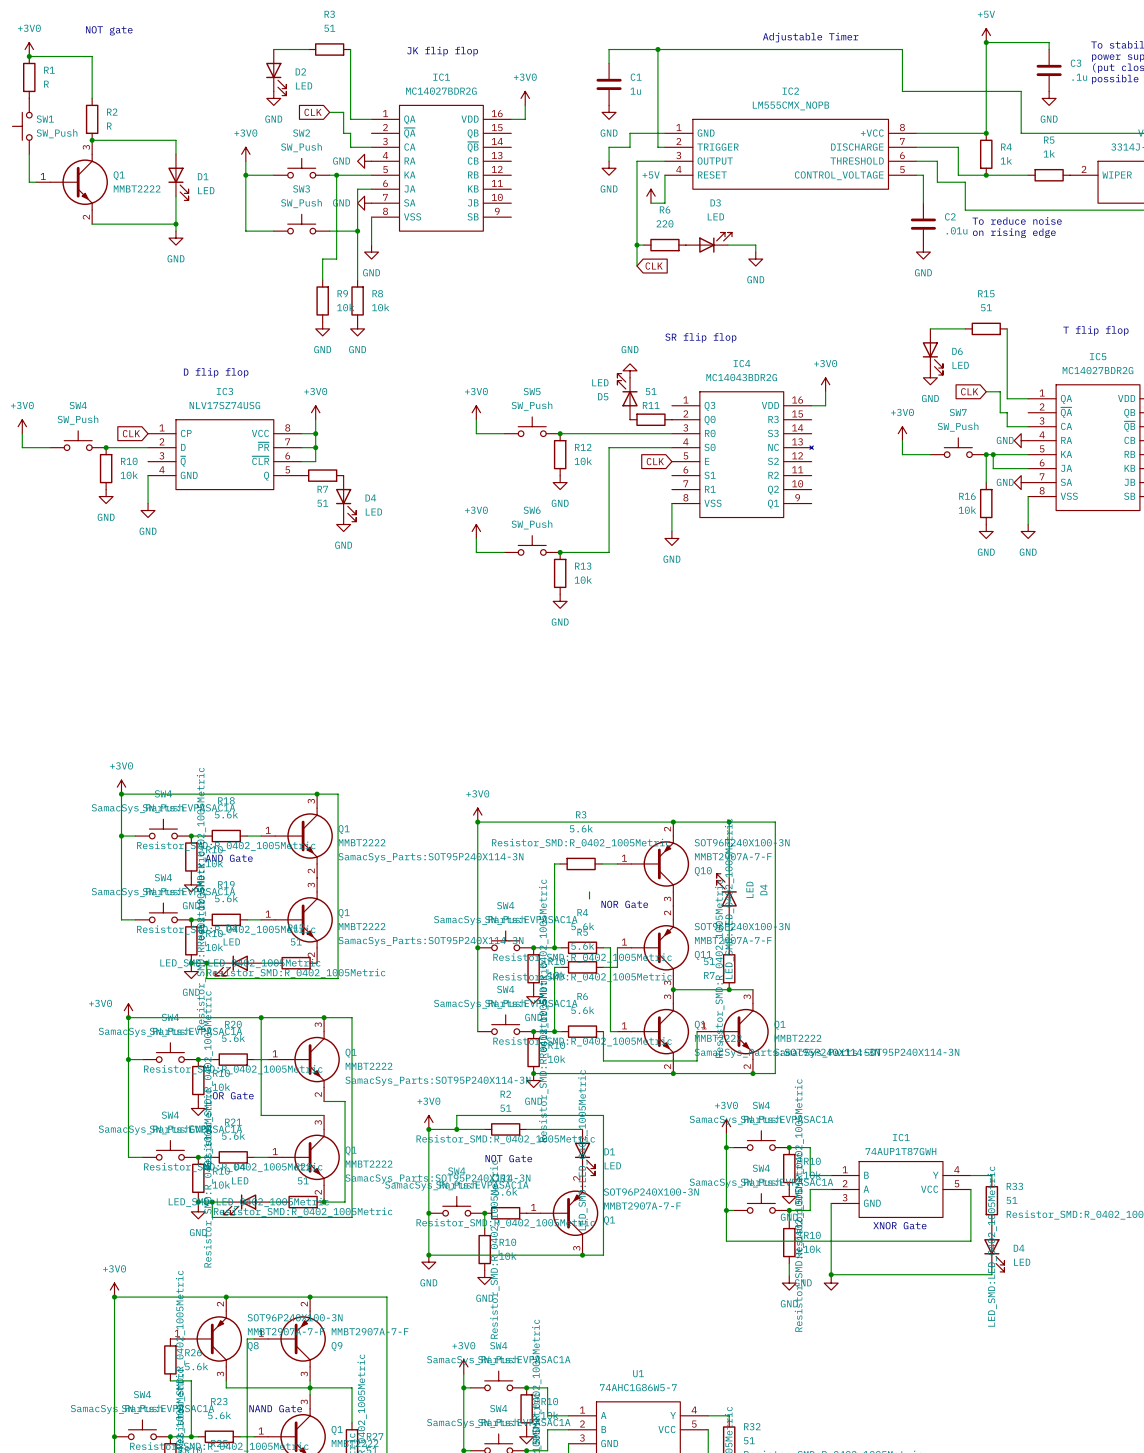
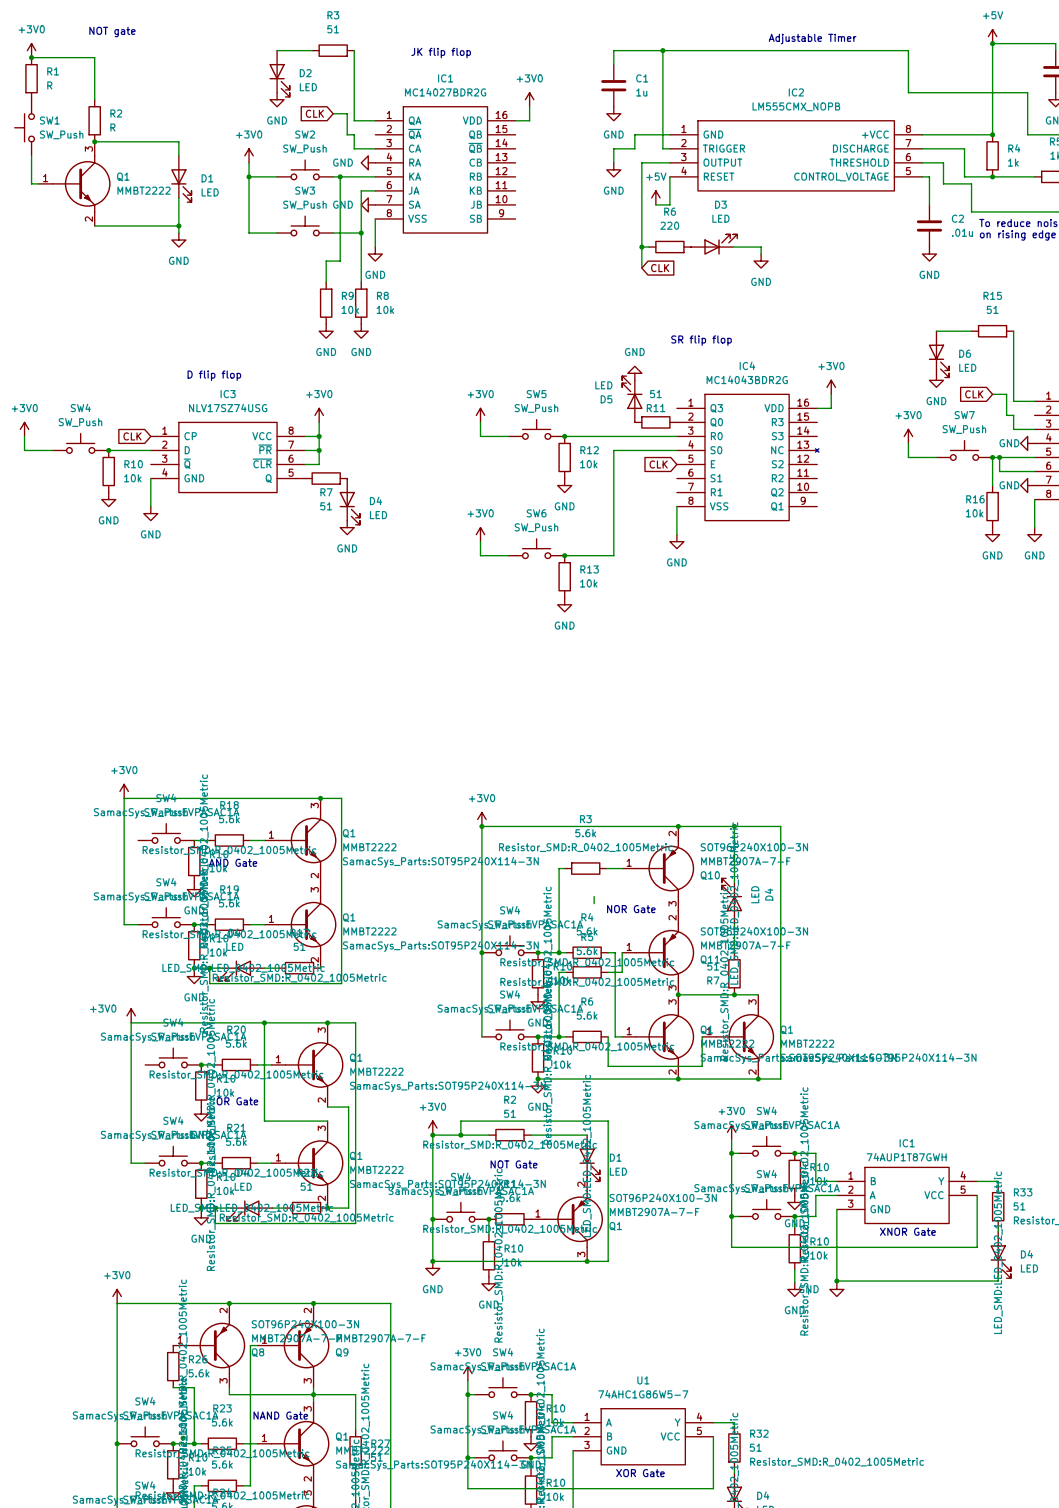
junction: (121, 794) -> none
wire: (121, 836) (135, 836) -> none
junction: (121, 836) -> none
junction: (191, 836) -> none
junction: (128, 1017) -> none
wire: (127, 1059) (142, 1059) -> none
junction: (128, 1059) -> none
junction: (114, 1297) -> none
junction: none -> (183, 1438)

